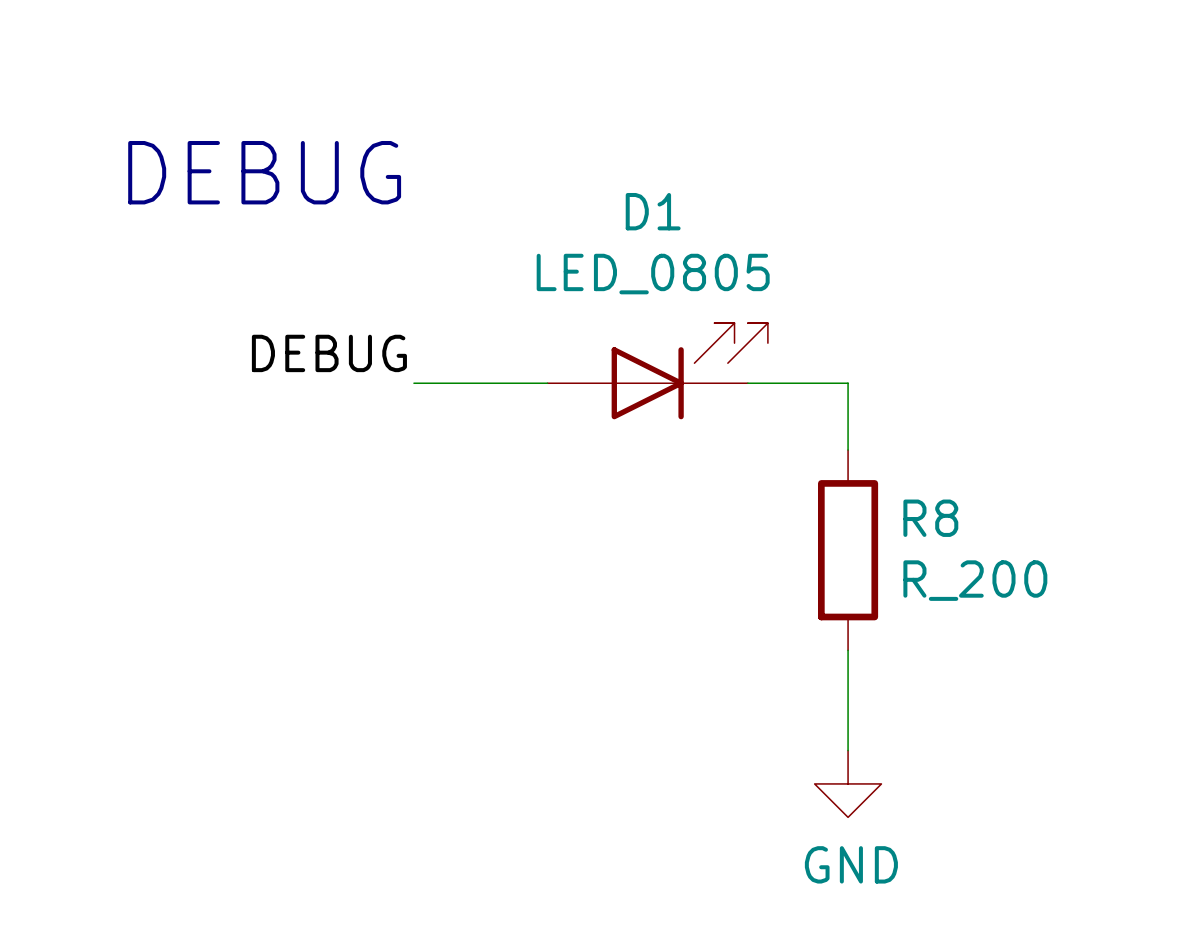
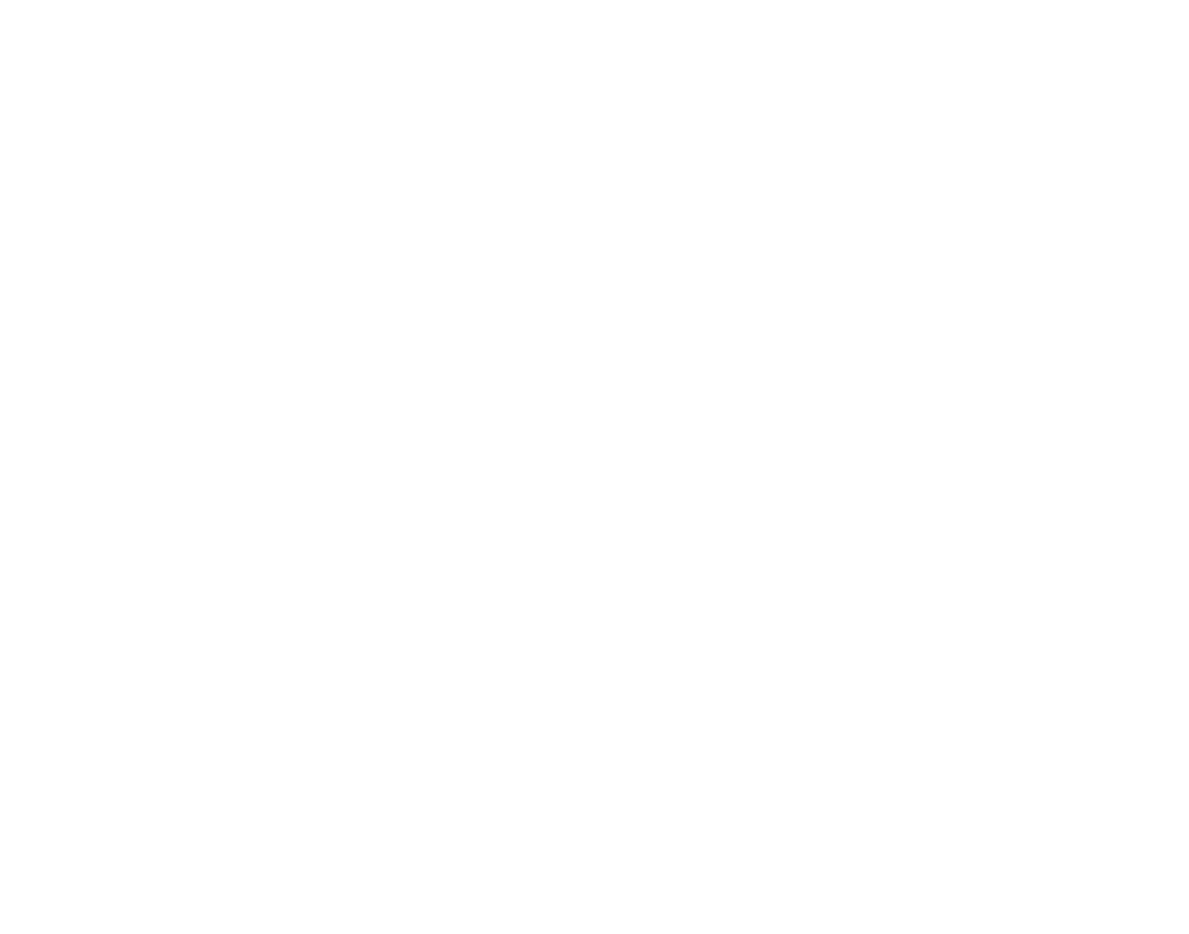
text: DEBUG (264, 172) -> none
label: DEBUG (329, 353) -> none
D1: LED_0805 (657, 371) -> none
wire: (413, 383) (547, 383) -> none
wire: (747, 383) (848, 383) (848, 450) -> none
R8: R_200 (848, 550) -> none
wire: (848, 650) (848, 750) -> none
power symbol: GND (848, 783) -> none

